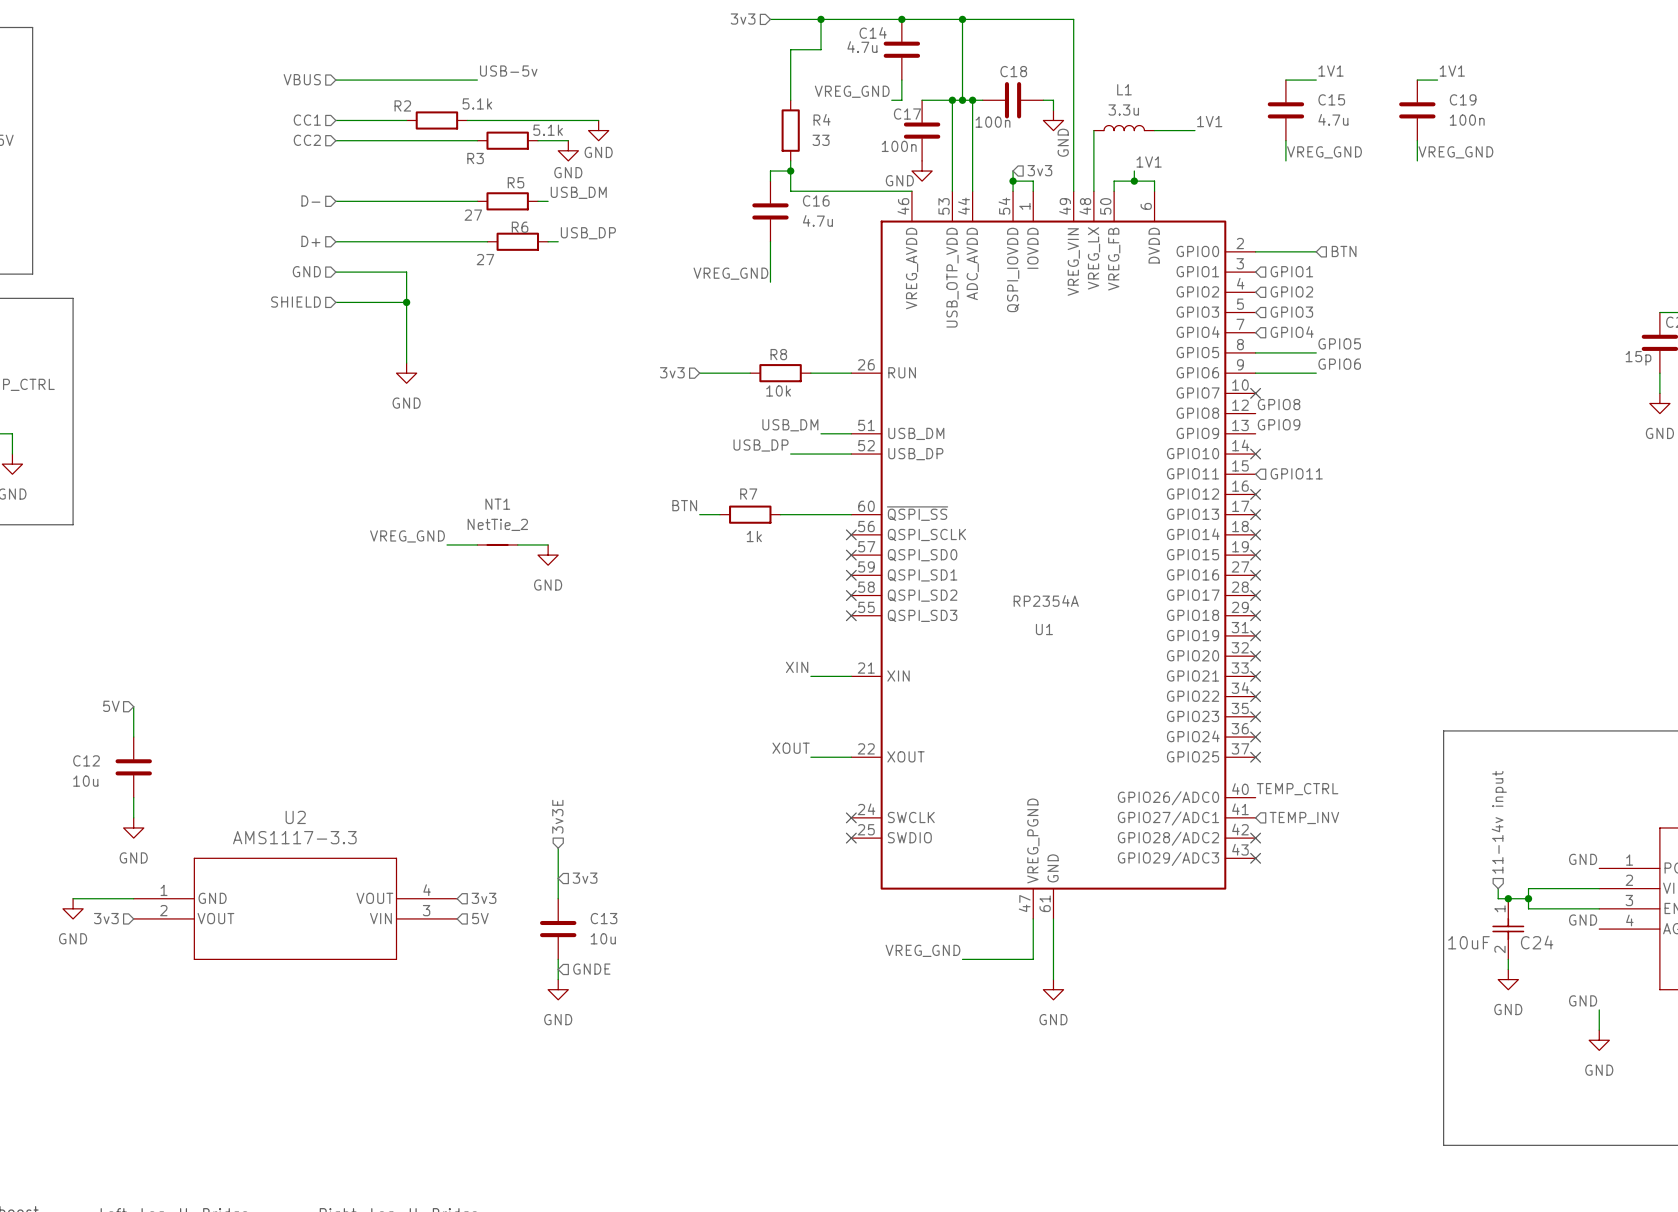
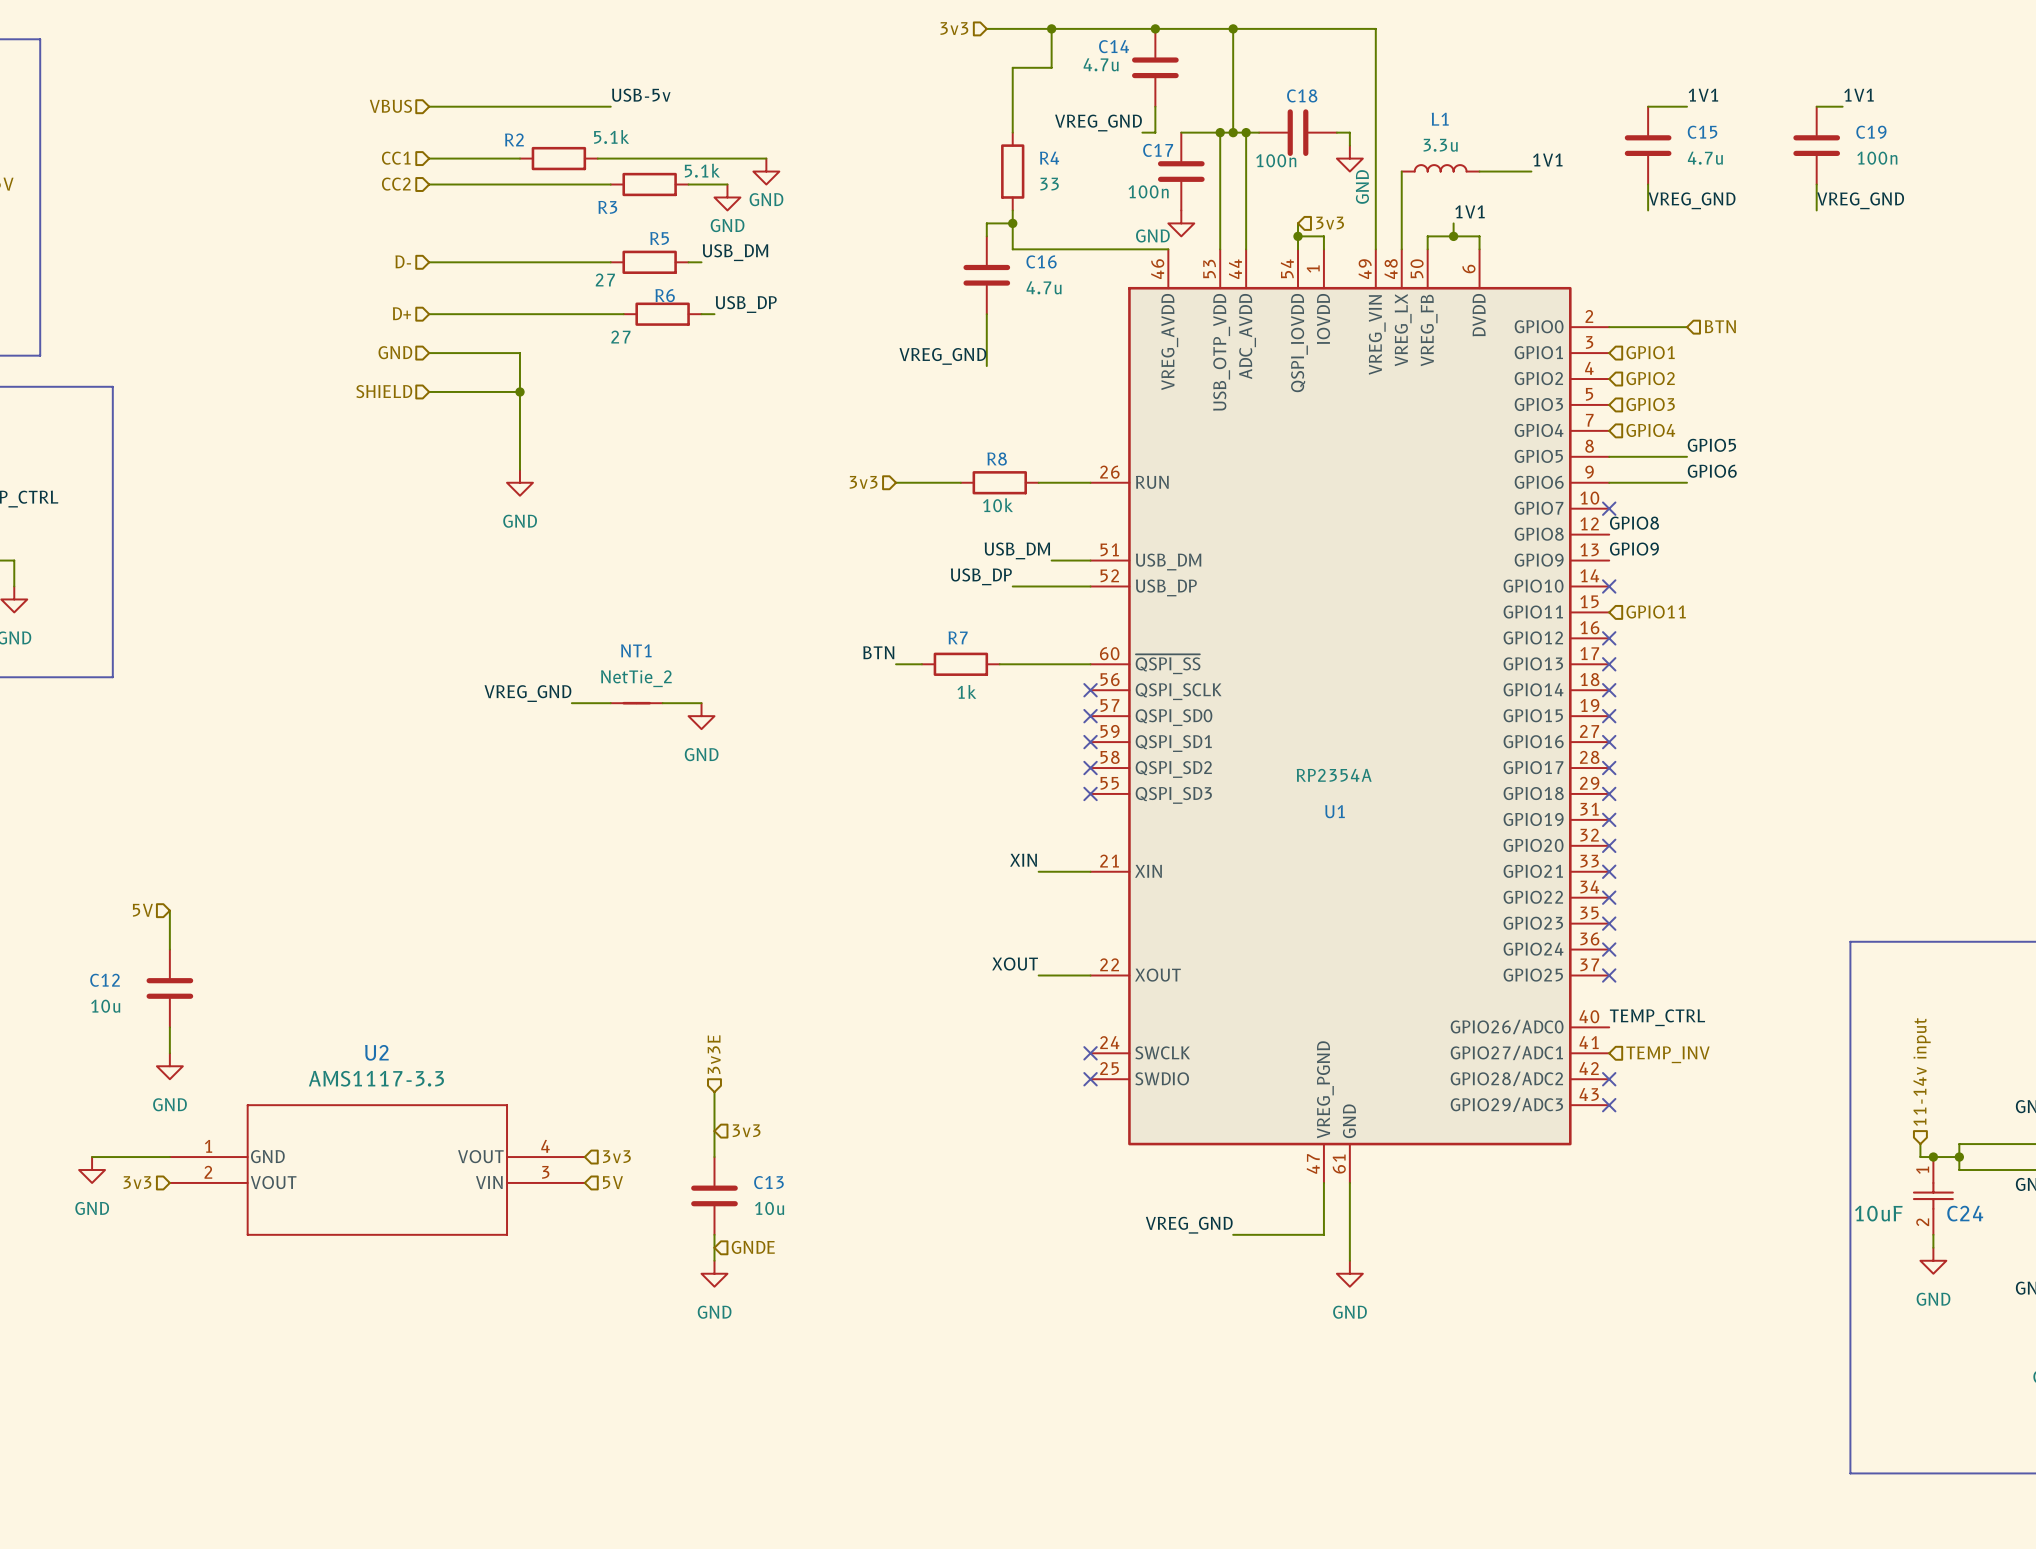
line: (73, 298) (73, 524) -> (92, 386) (112, 386) (112, 677) (92, 677)

